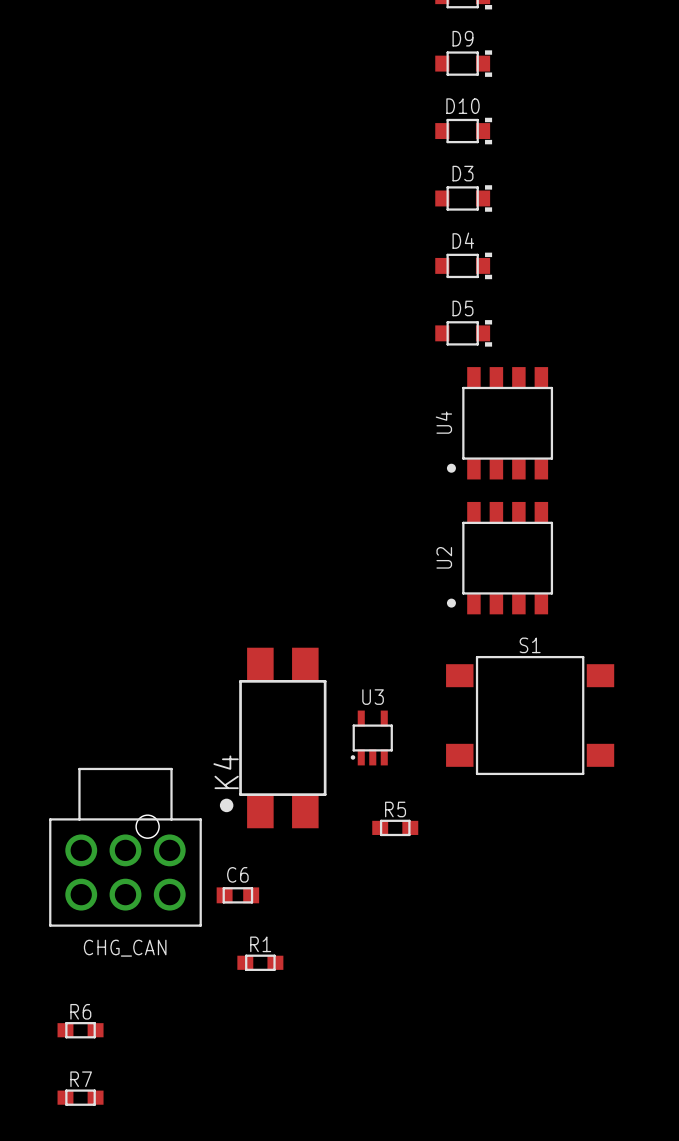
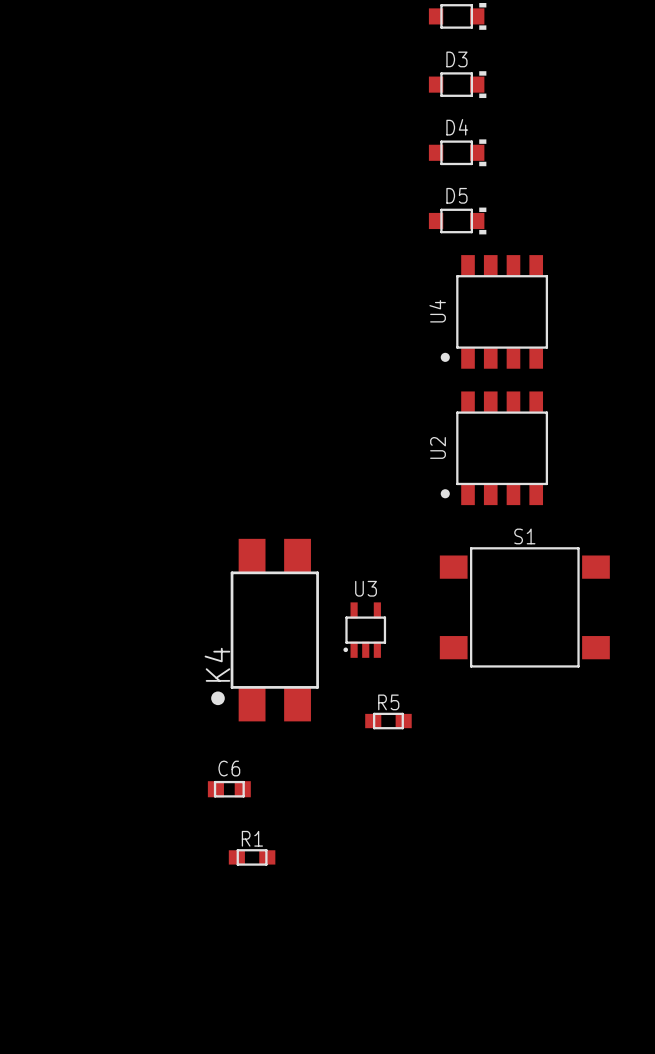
CHG_CAN: (125, 847) -> none
R6: (80, 1030) -> none
R7: (80, 1097) -> none

